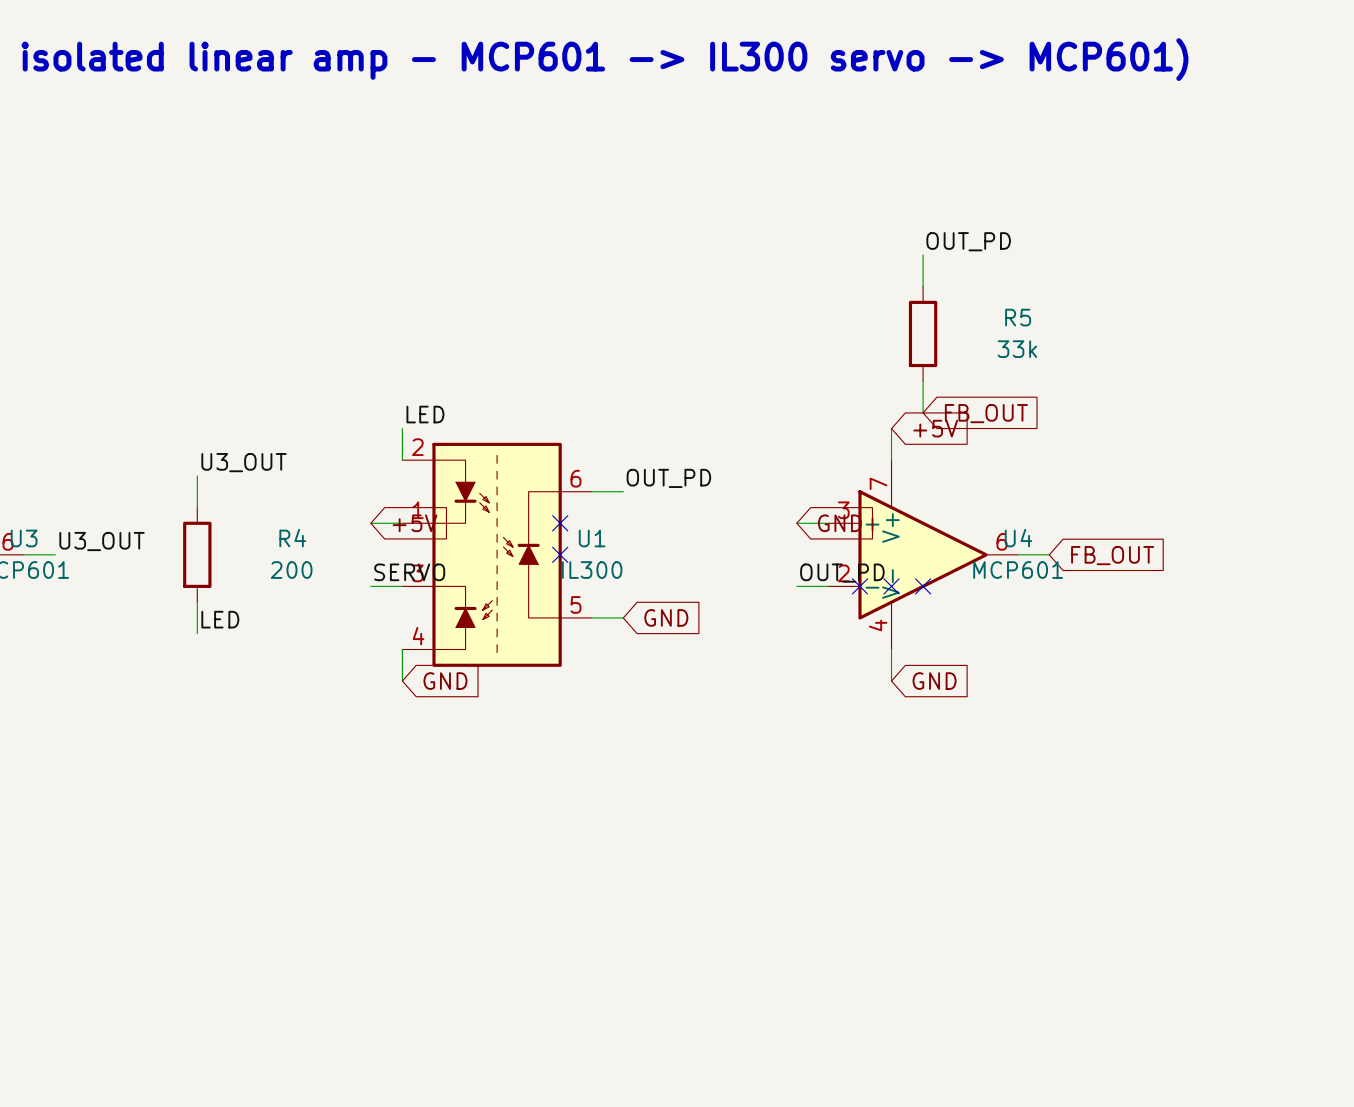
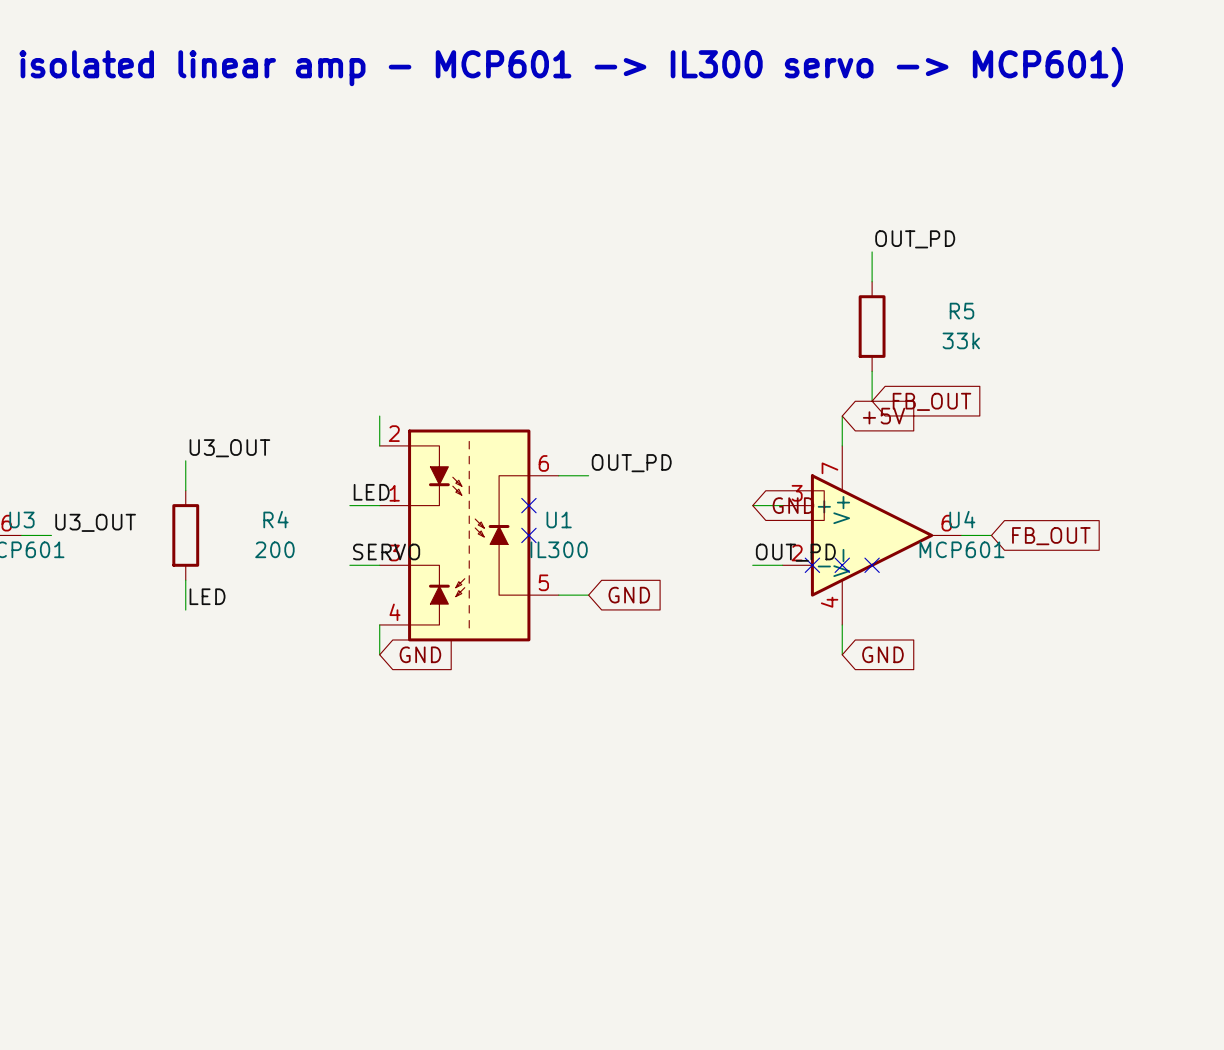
label position: LED (425, 414) -> LED (371, 492)
global label: +5V (415, 523) -> none

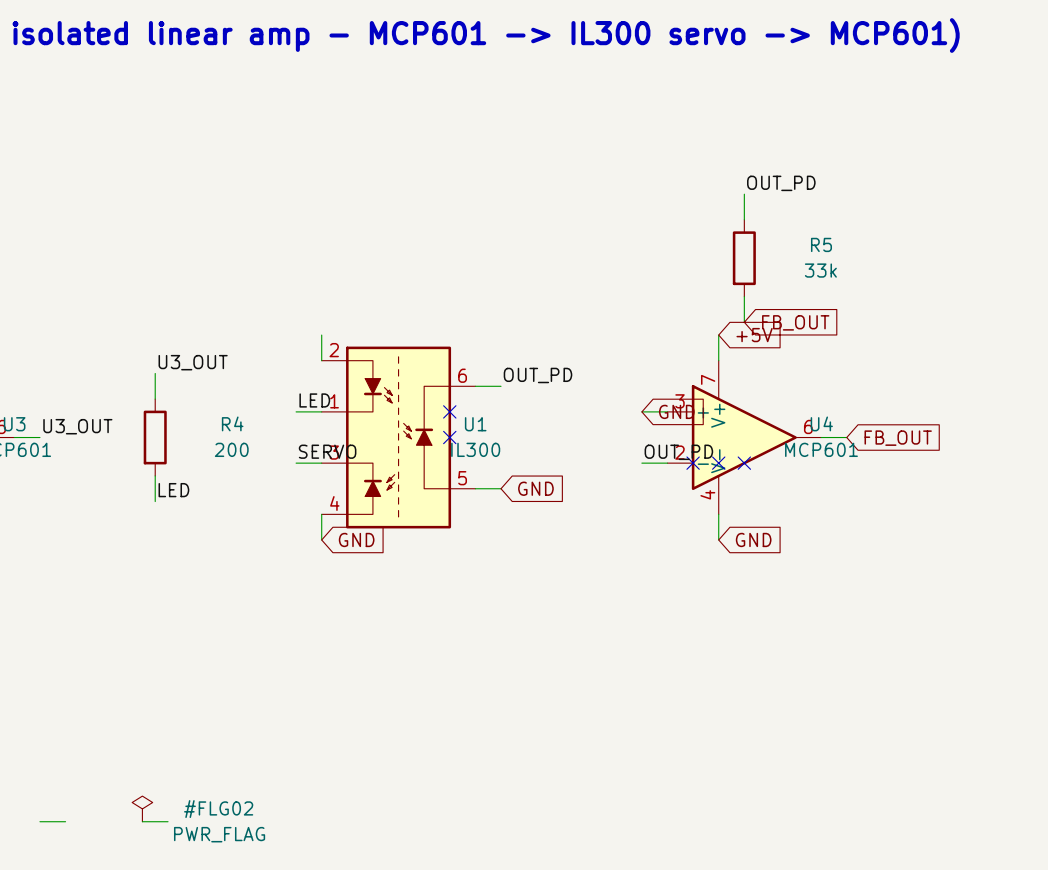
#FLG02: none -> PWR_FLAG (142, 808)
wire: none -> (39, 821) (65, 821)
wire: none -> (142, 821) (168, 821)

